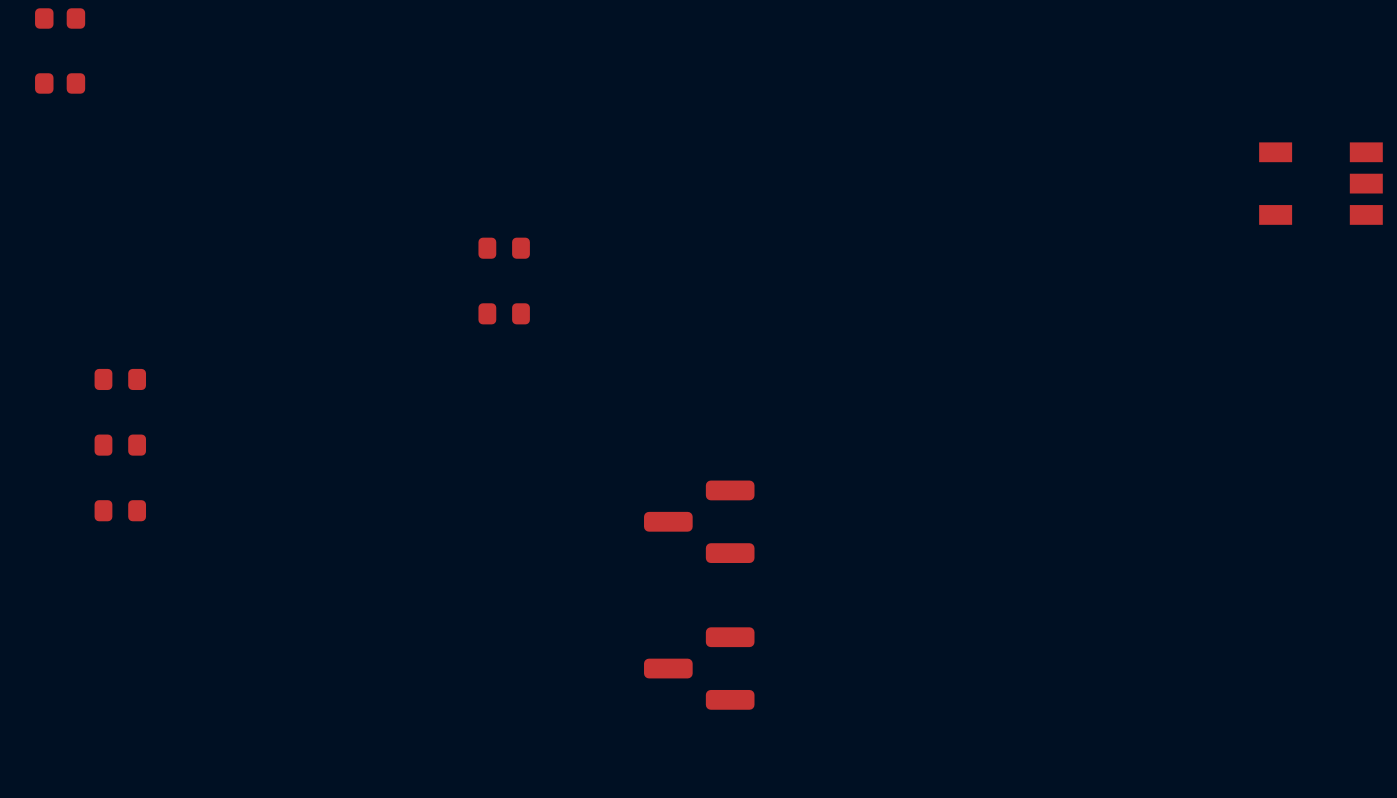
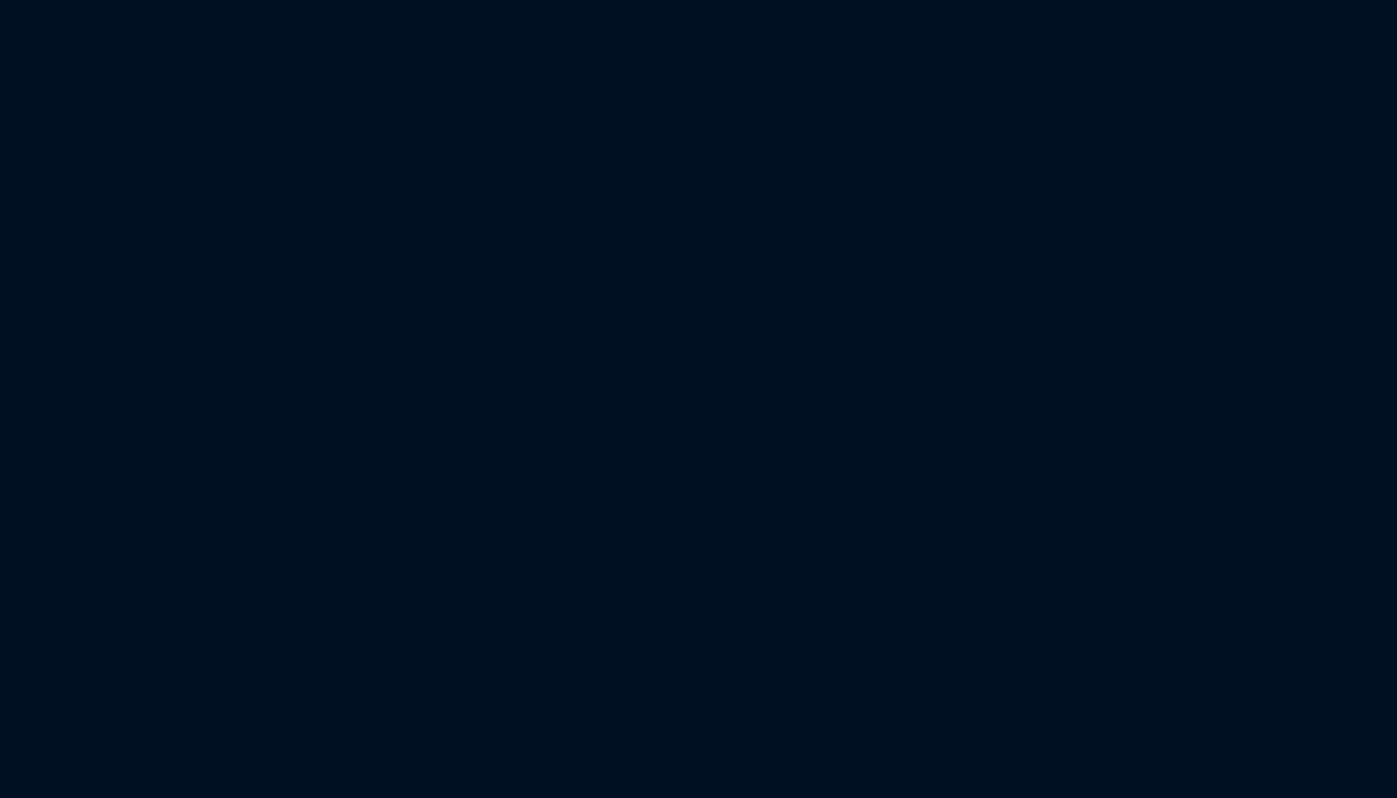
part: (60, 18) -> none
part: (60, 83) -> none
part: (1320, 183) -> none
part: (504, 248) -> none
part: (504, 313) -> none
part: (120, 379) -> none
part: (120, 445) -> none
part: (120, 510) -> none
part: (699, 521) -> none
part: (699, 668) -> none

